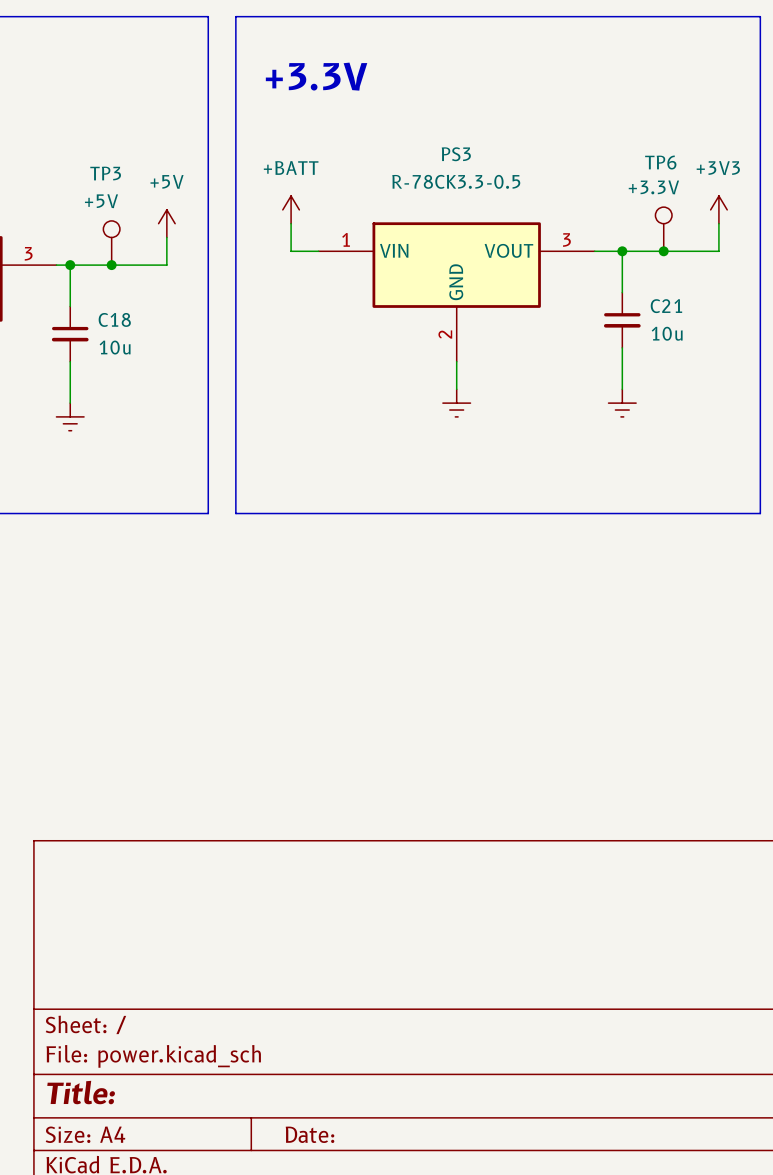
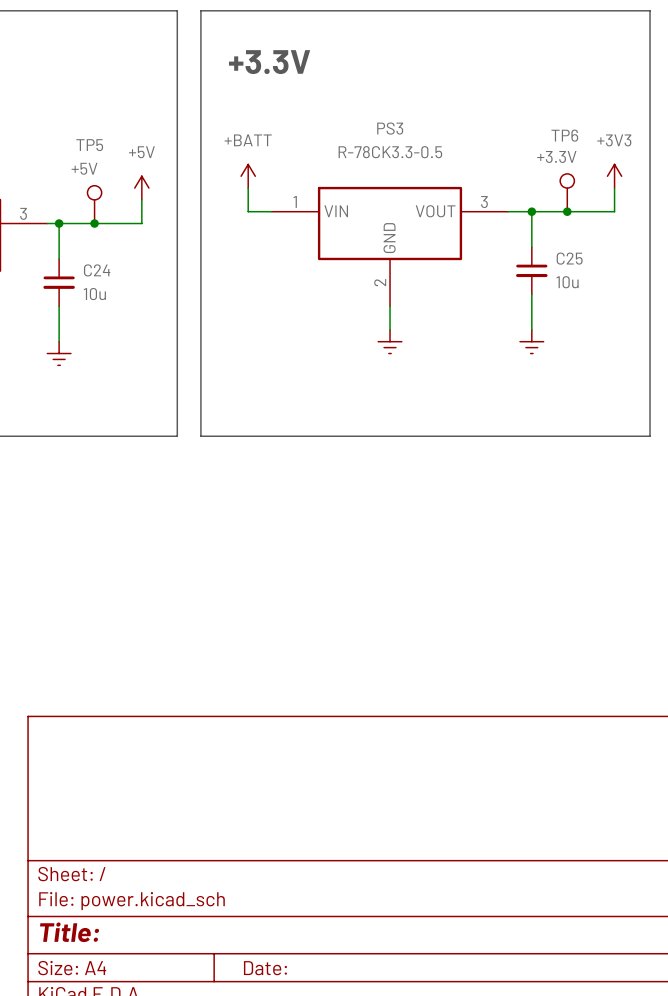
TP3 name: TP3 (105, 173) -> TP5 (89, 145)
C21 name: C21 (666, 306) -> C25 (569, 258)
C18 name: C18 (114, 319) -> C24 (97, 270)

